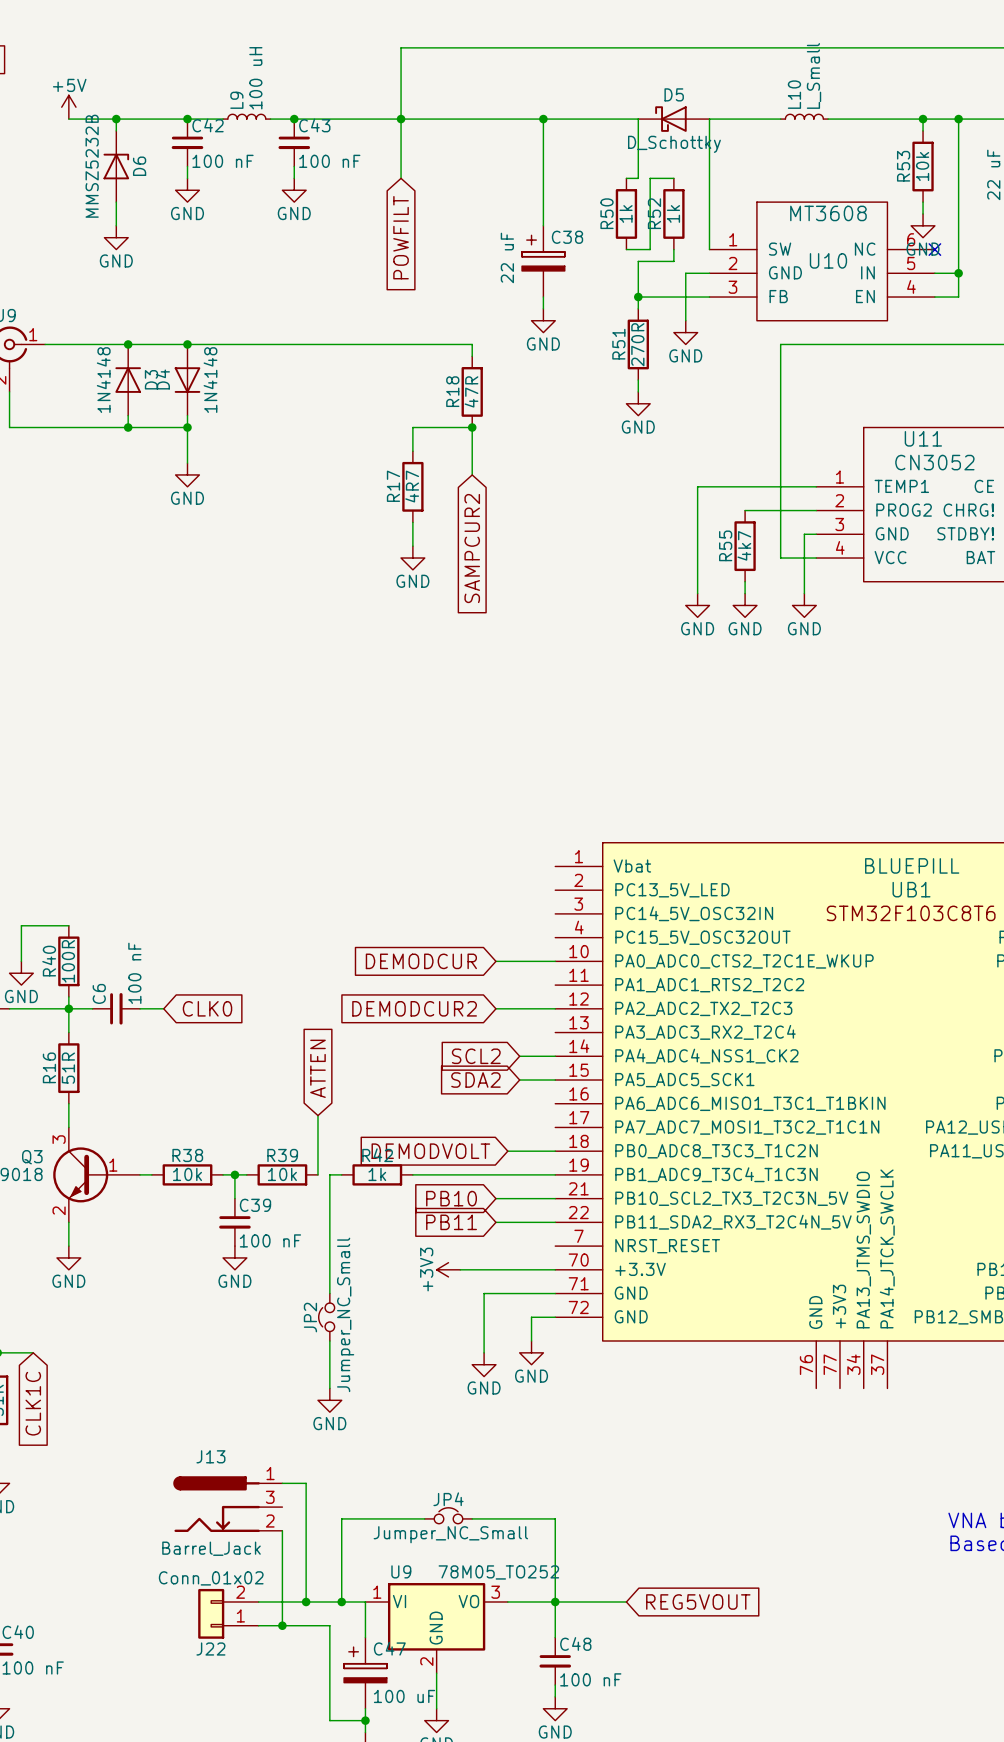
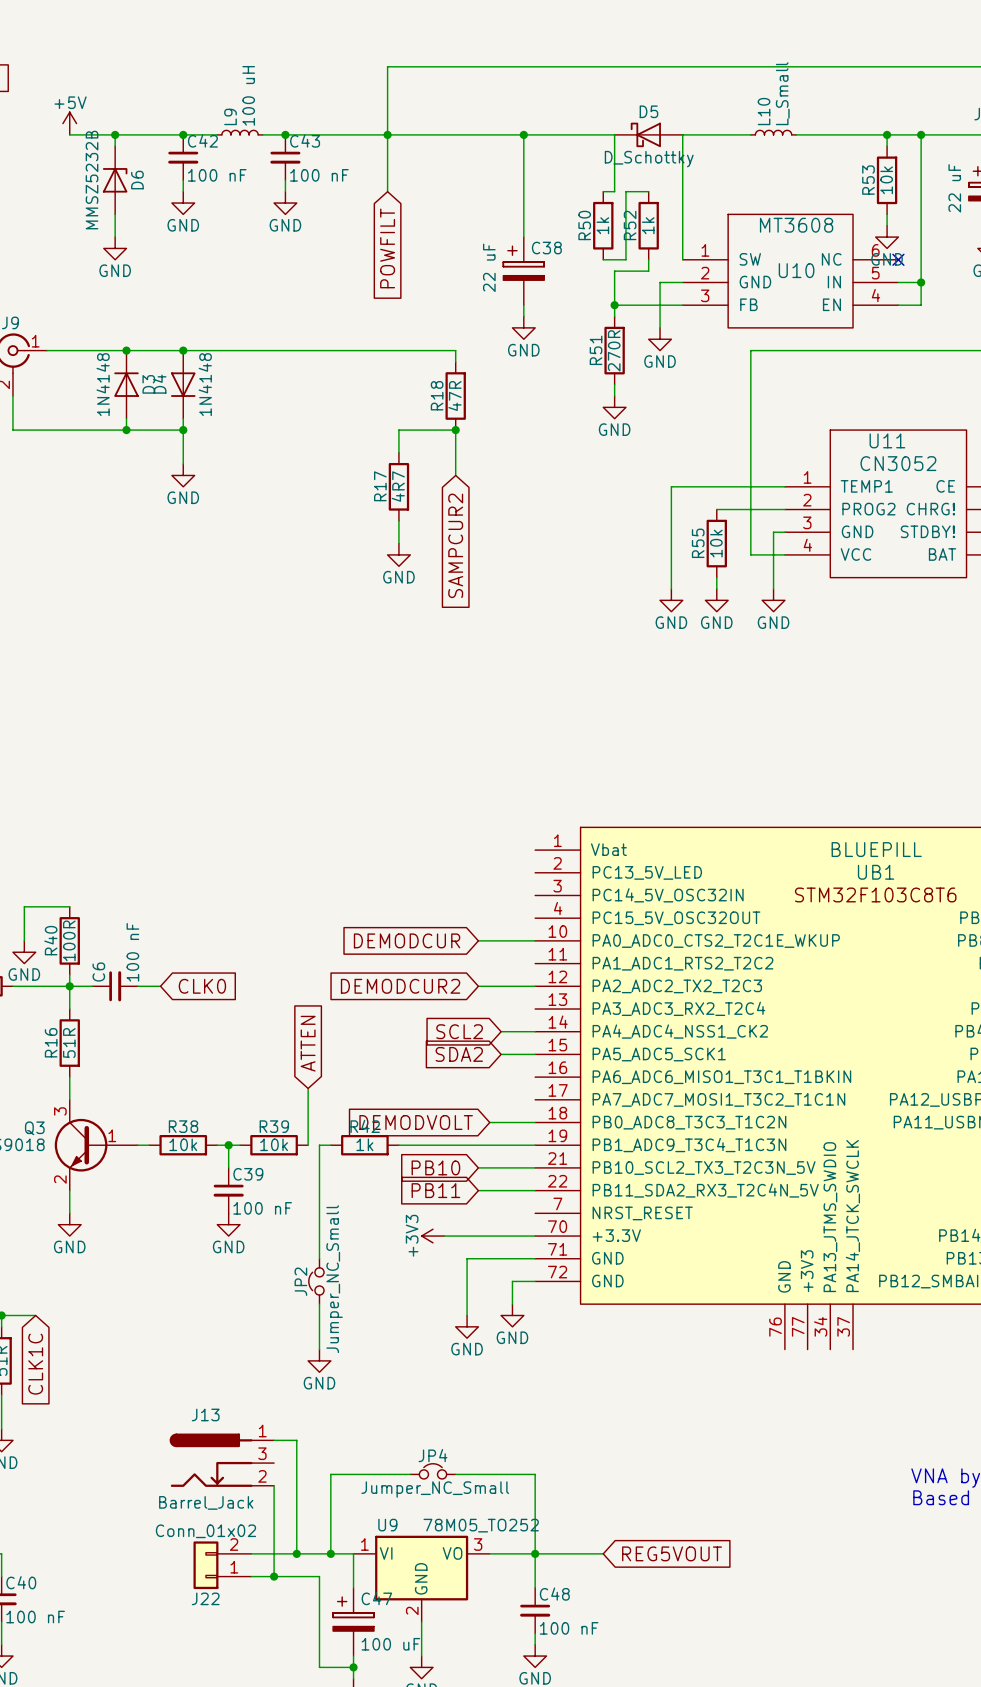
R55 value: 4k7 (744, 545) -> 10k (716, 543)

